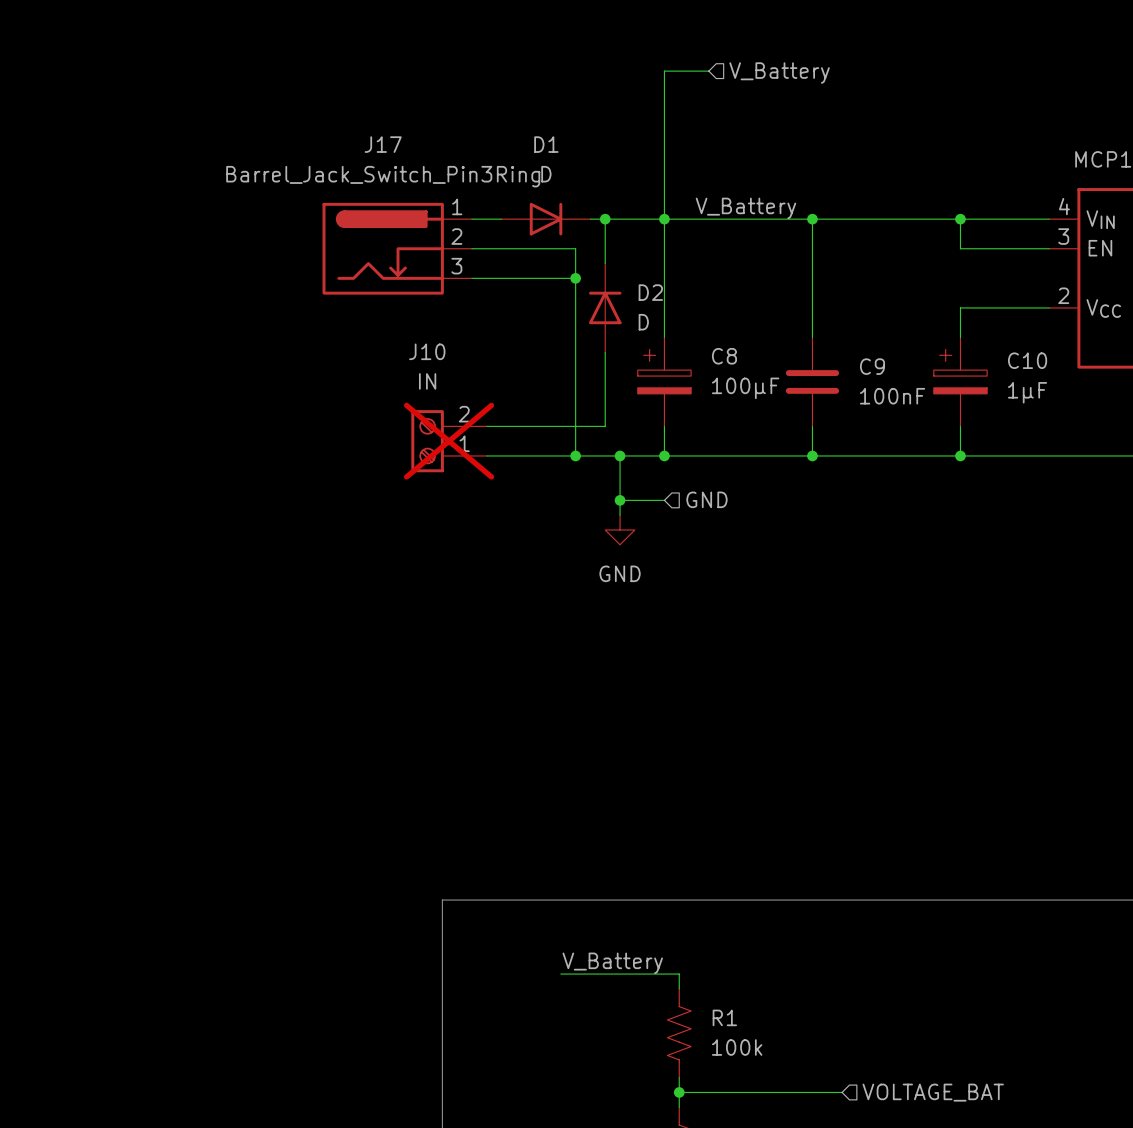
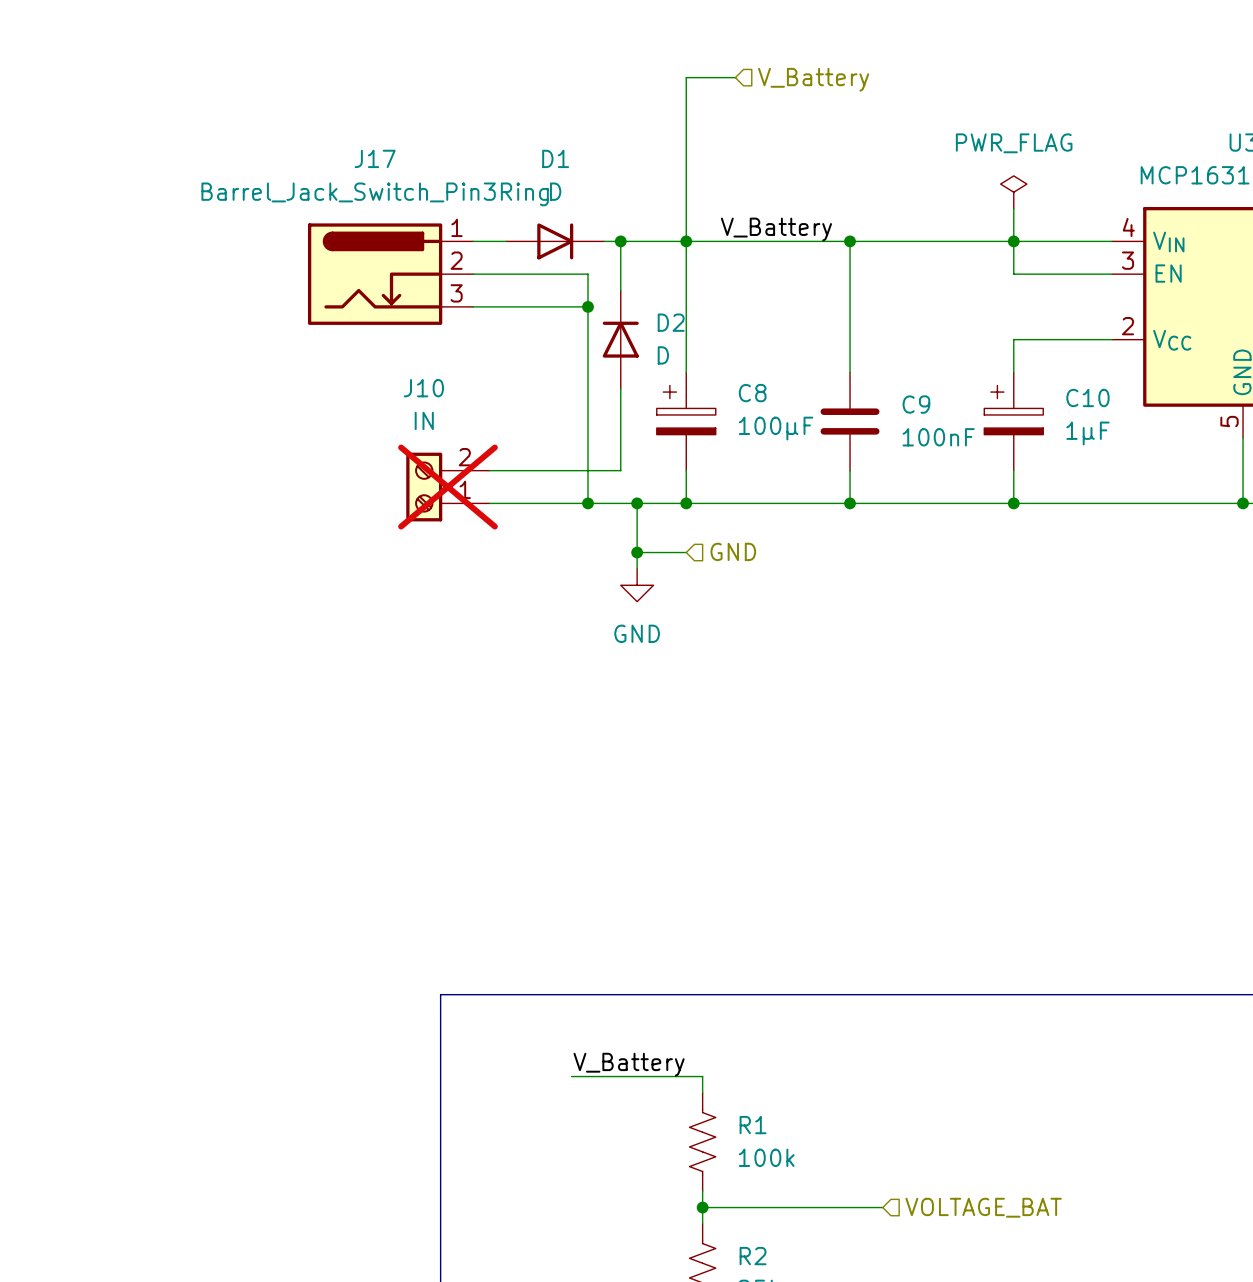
power symbol: none -> PWR_FLAG (1013, 192)
wire: none -> (1013, 208) (1013, 241)

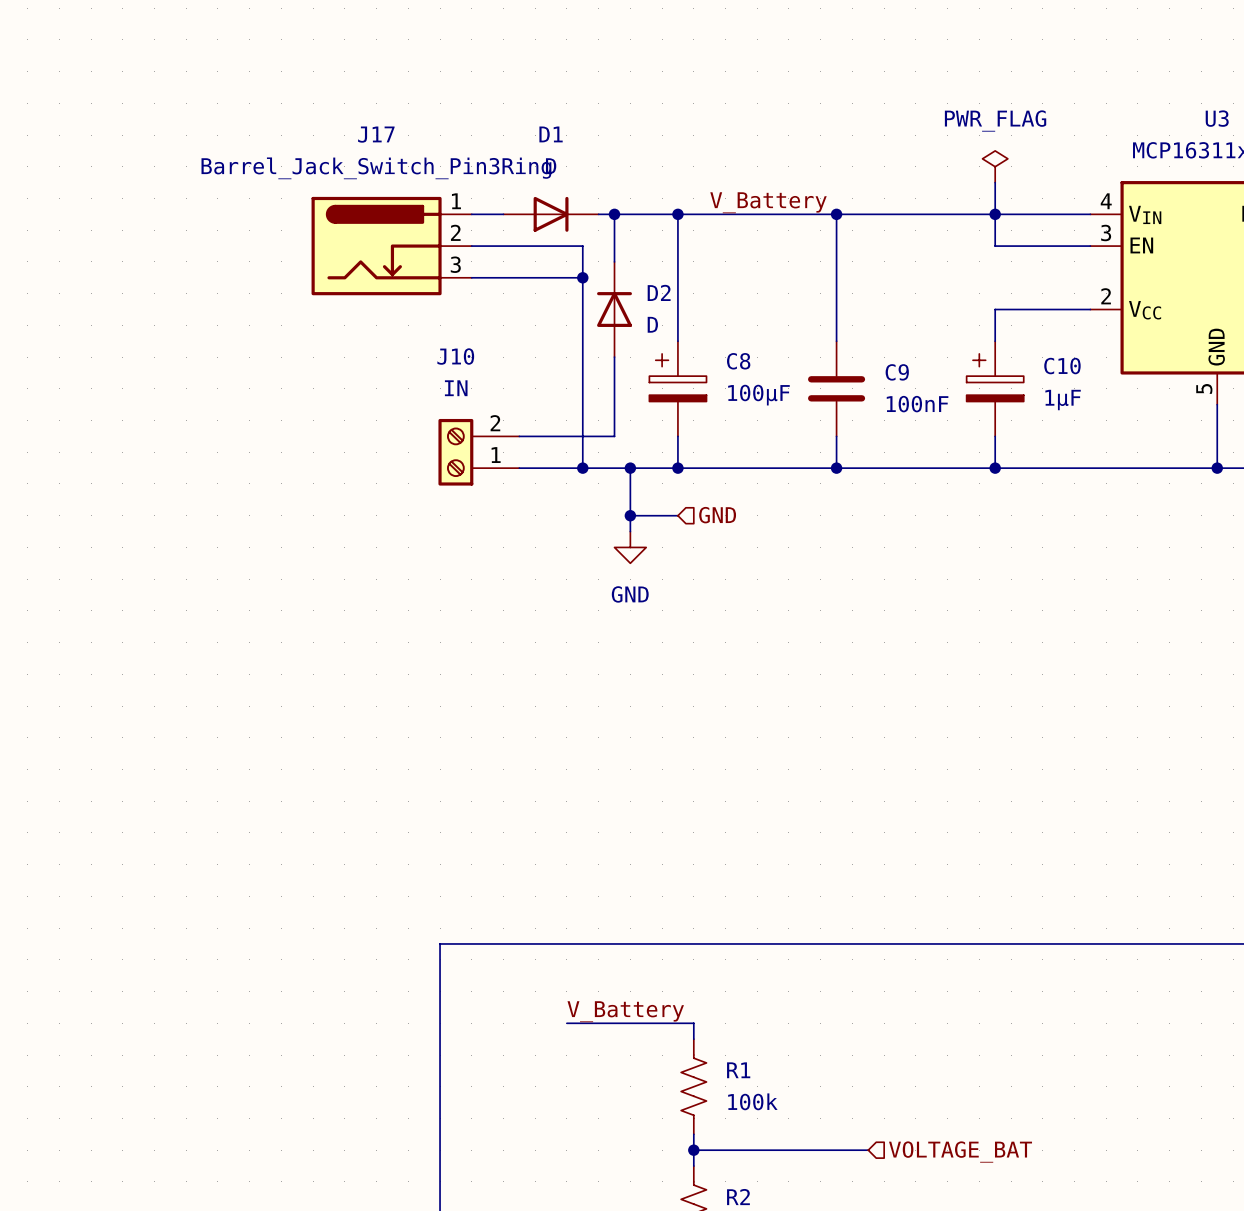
wire: (735, 77) (686, 77) (686, 241) -> none
hierarchical label: V_Battery (813, 79) -> none
J10 position: (447, 487) -> (478, 452)
J10 do-not-place cross: (447, 487) -> none

